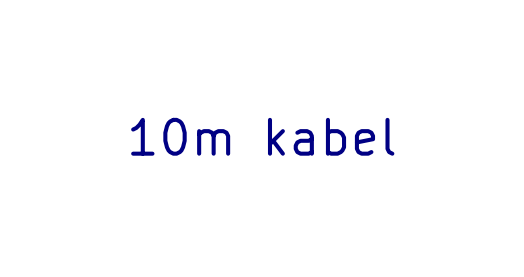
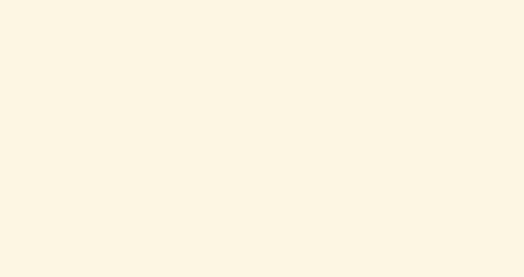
text: 10m kabel (262, 136) -> none

